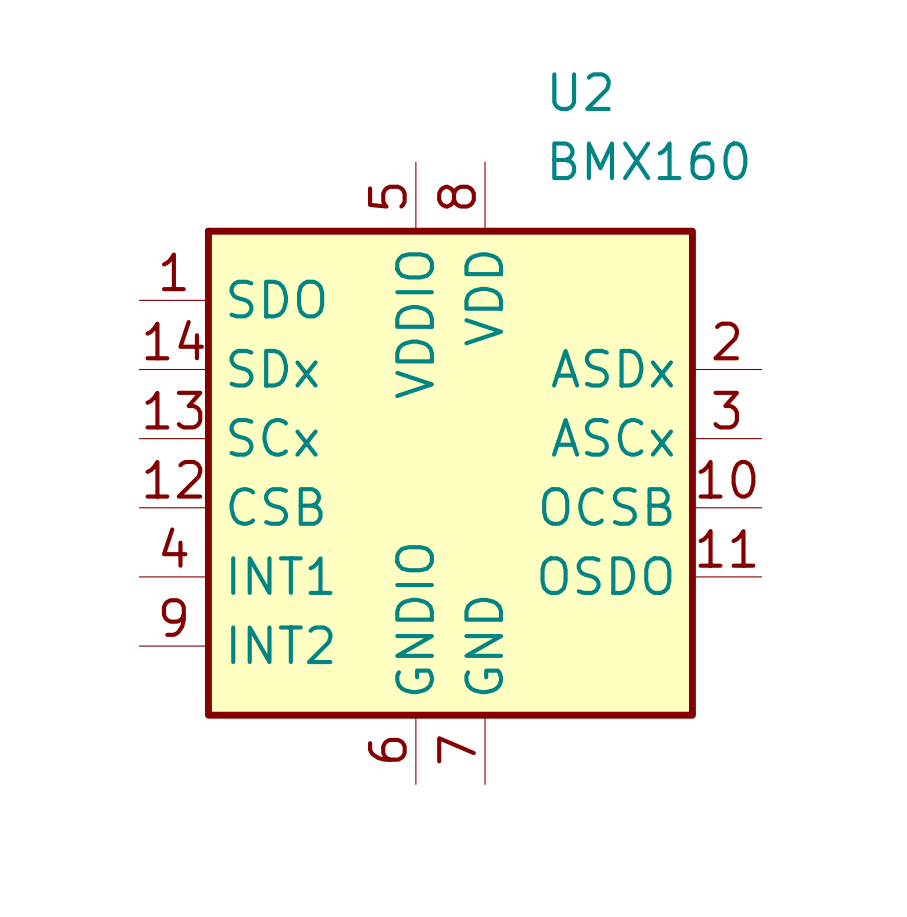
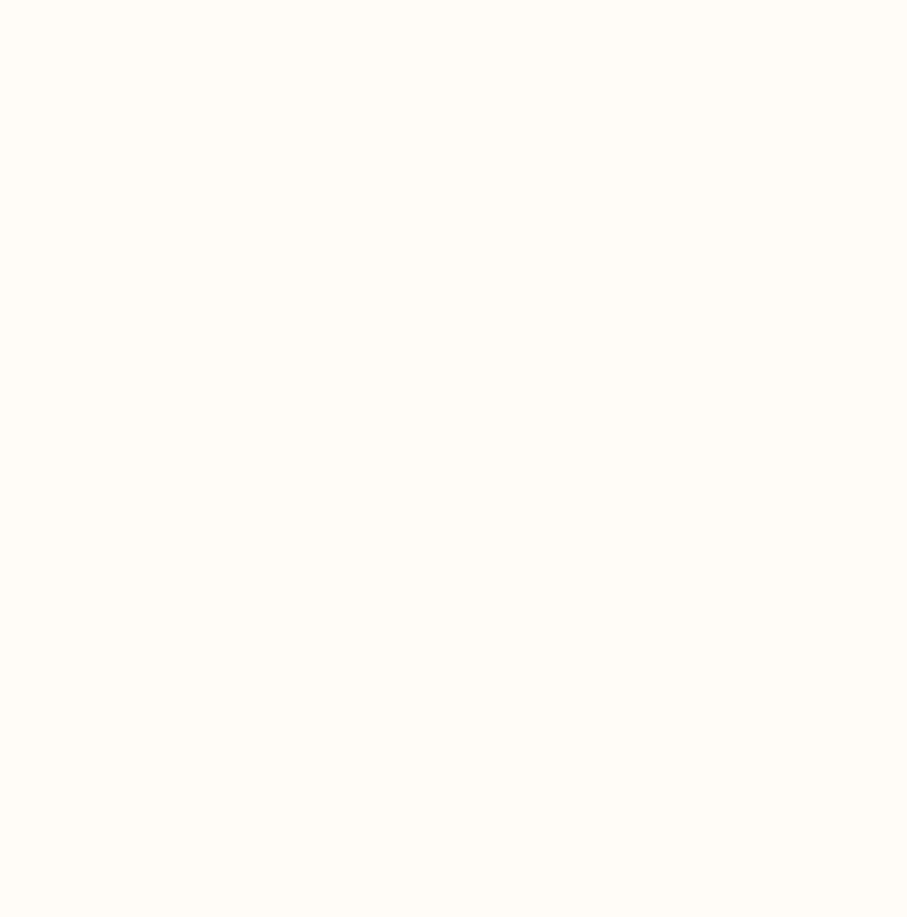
U2: BMX160 (450, 473) -> none

